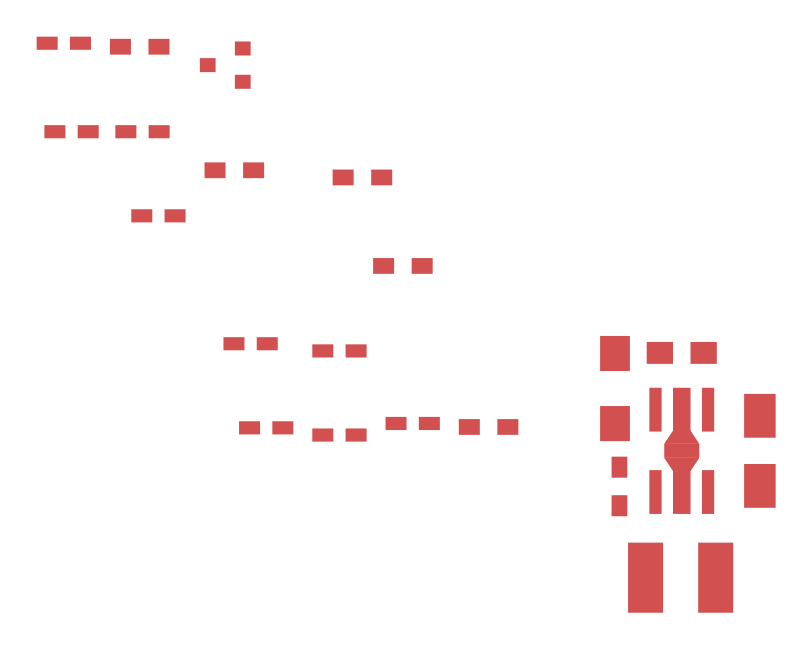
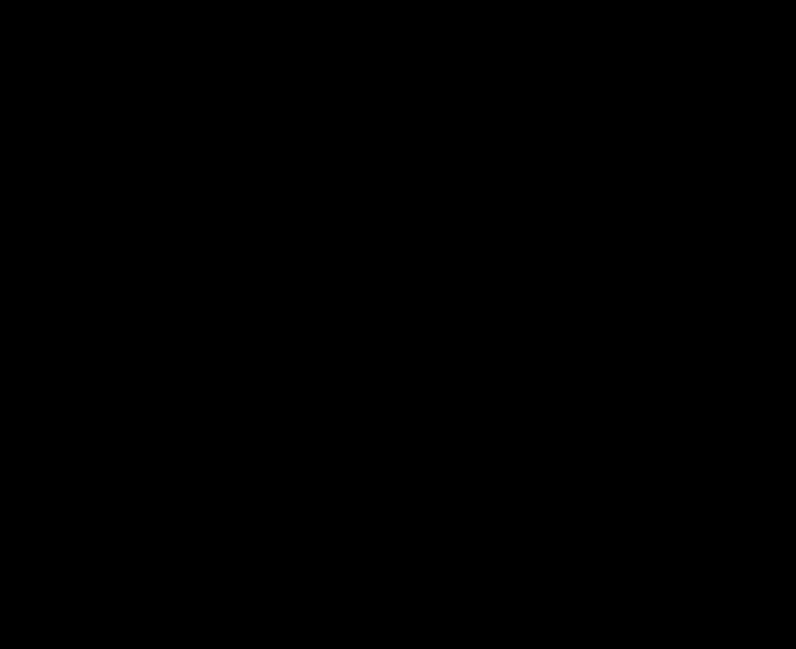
part: (63, 43) -> none
part: (139, 46) -> none
part: (225, 65) -> none
part: (71, 131) -> none
part: (142, 131) -> none
part: (234, 170) -> none
part: (362, 177) -> none
part: (158, 215) -> none
part: (402, 265) -> none
part: (250, 343) -> none
part: (339, 350) -> none
part: (681, 352) -> none
part: (615, 388) -> none
part: (412, 423) -> none
part: (488, 426) -> none
part: (266, 427) -> none
part: (339, 435) -> none
part: (681, 450) -> none
part: (759, 450) -> none
part: (619, 486) -> none
part: (680, 577) -> none

